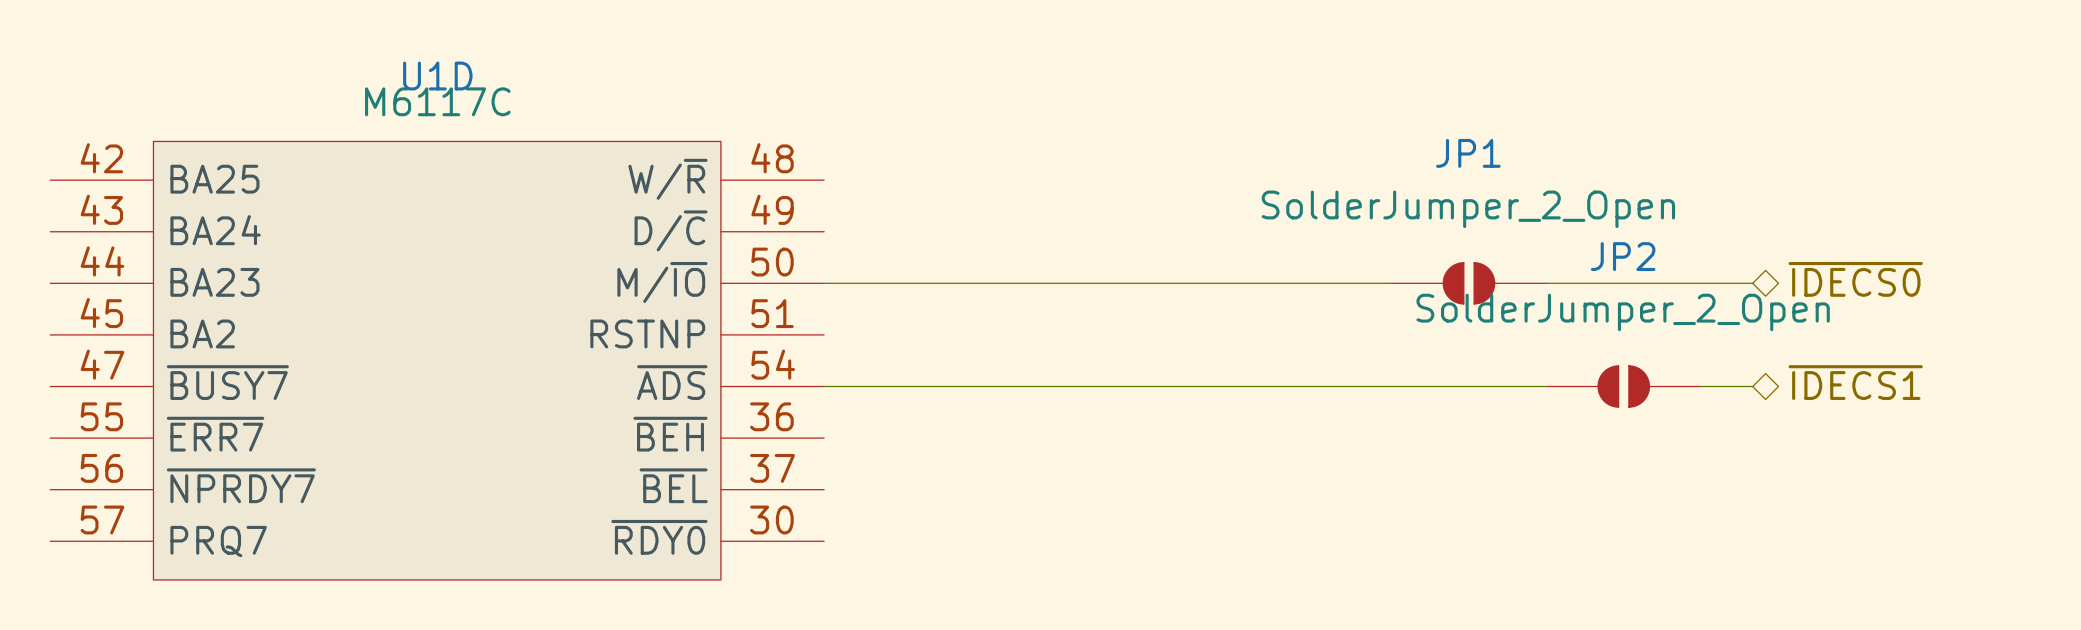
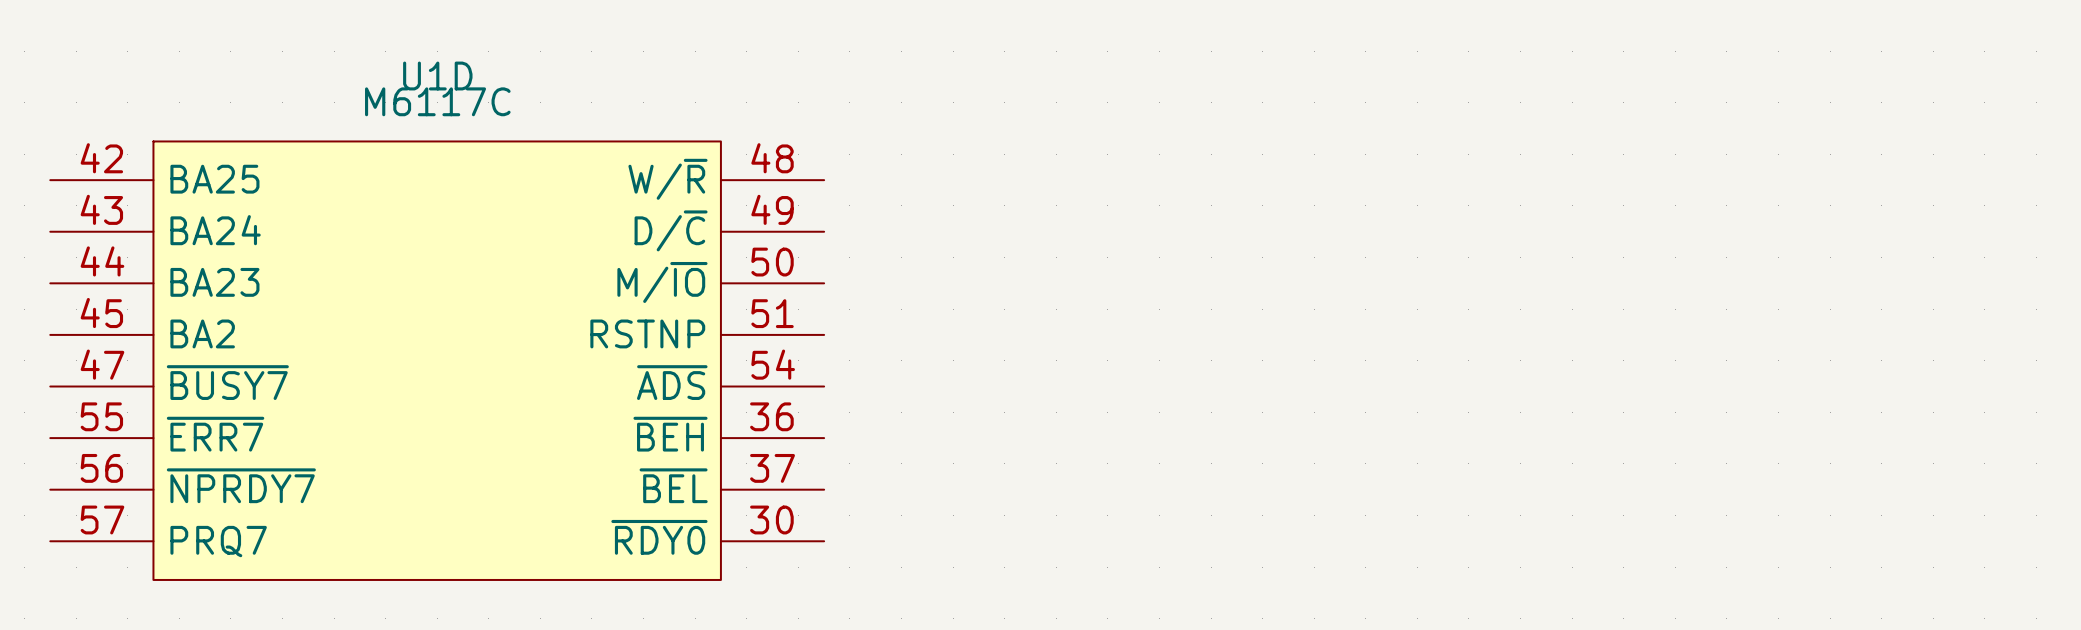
hierarchical label: ~{IDECS0} (1855, 279) -> none
wire: (824, 283) (1391, 283) -> none
JP1: SolderJumper_2_Open (1468, 283) -> none
wire: (1546, 283) (1752, 283) -> none
hierarchical label: ~{IDECS1} (1855, 382) -> none
wire: (824, 386) (1546, 386) -> none
JP2: SolderJumper_2_Open (1623, 386) -> none
wire: (1701, 386) (1752, 386) -> none

